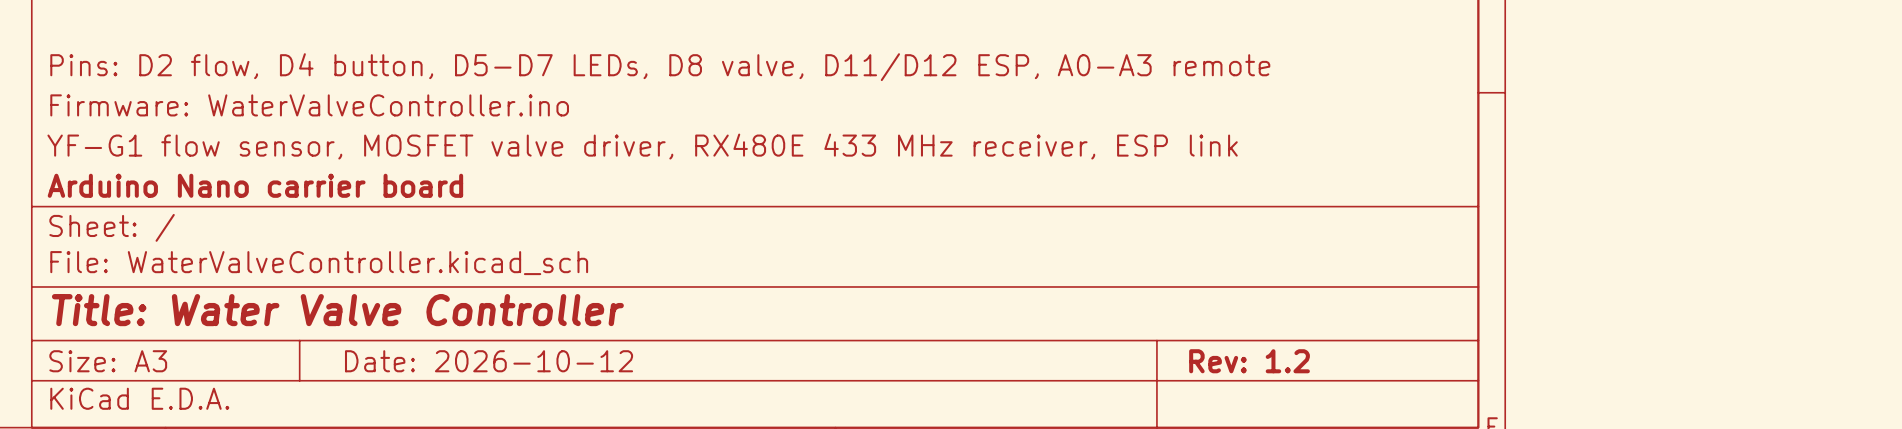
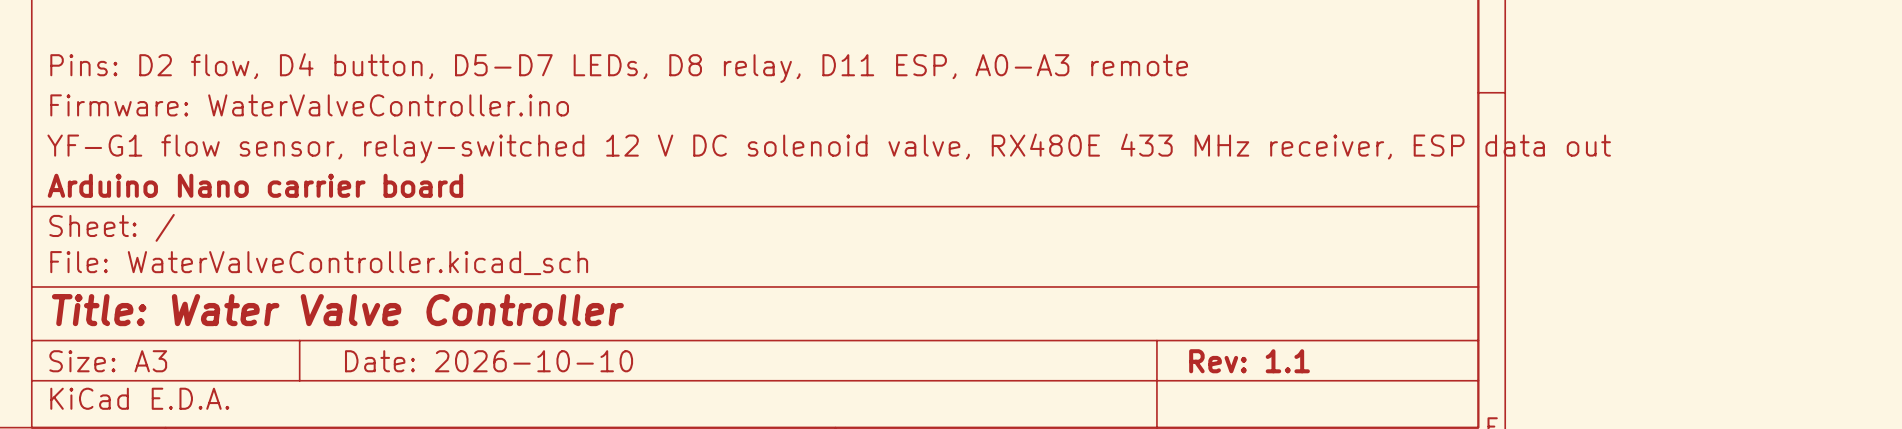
title block: Pins: D2 flow, D4 button, D5-D7 LEDs, D8 valve, D11/D12 ESP, A0-A3 remote (660, 67) -> Pins: D2 flow, D4 button, D5-D7 LEDs, D8 relay, D11 ESP, A0-A3 remote (619, 68)
title block: YF-G1 flow sensor, MOSFET valve driver, RX480E 433 MHz receiver, ESP link (642, 146) -> YF-G1 flow sensor, relay-switched 12 V DC solenoid valve, RX480E 433 MHz receiver, ESP data out (829, 148)
title block: Date: 2026-10-12 (489, 361) -> Date: 2026-10-10 (489, 361)
title block: Rev: 1.2 (1249, 361) -> Rev: 1.1 (1249, 361)

